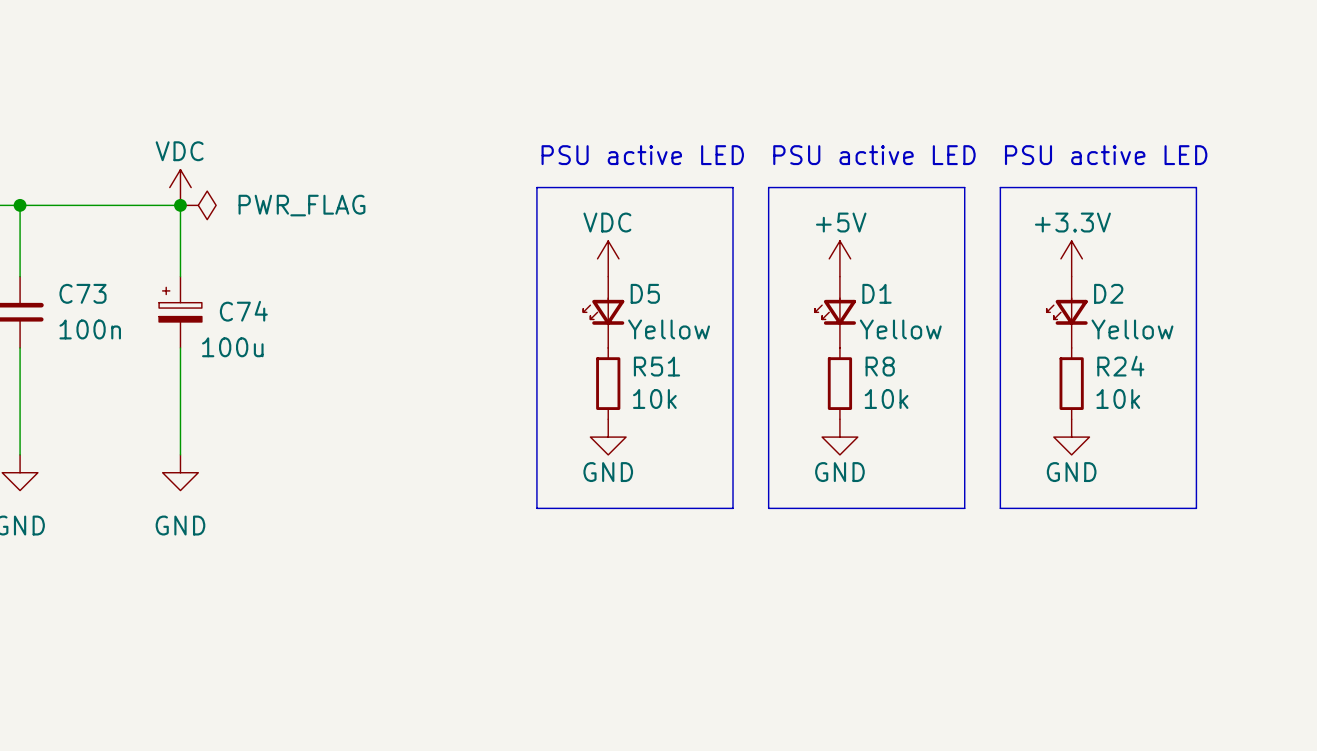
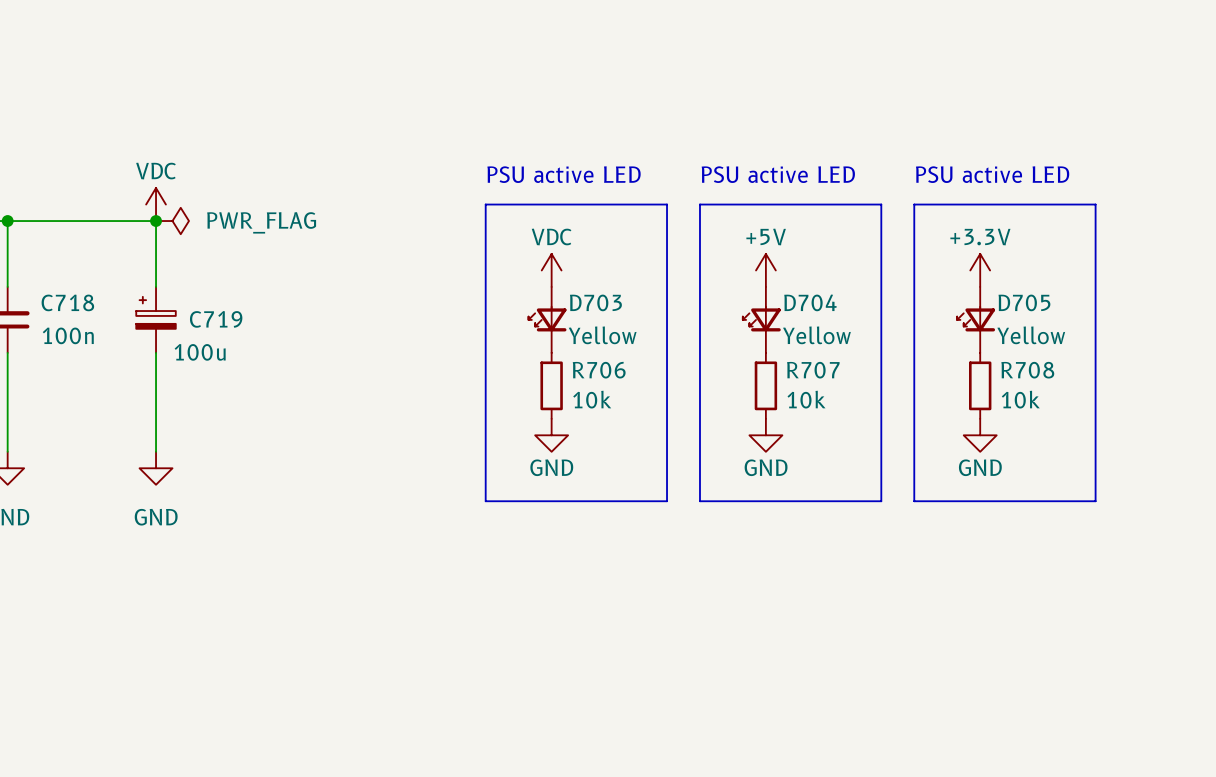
C73 name: C73 (83, 293) -> C718 (67, 302)
D5 name: D5 (645, 293) -> D703 (595, 302)
D1 name: D1 (877, 293) -> D704 (810, 302)
D2 name: D2 (1108, 293) -> D705 (1024, 302)
C74 name: C74 (243, 311) -> C719 (216, 319)
R51 name: R51 (656, 366) -> R706 (599, 370)
R8 name: R8 (880, 366) -> R707 (813, 370)
R24 name: R24 (1120, 366) -> R708 (1027, 370)

